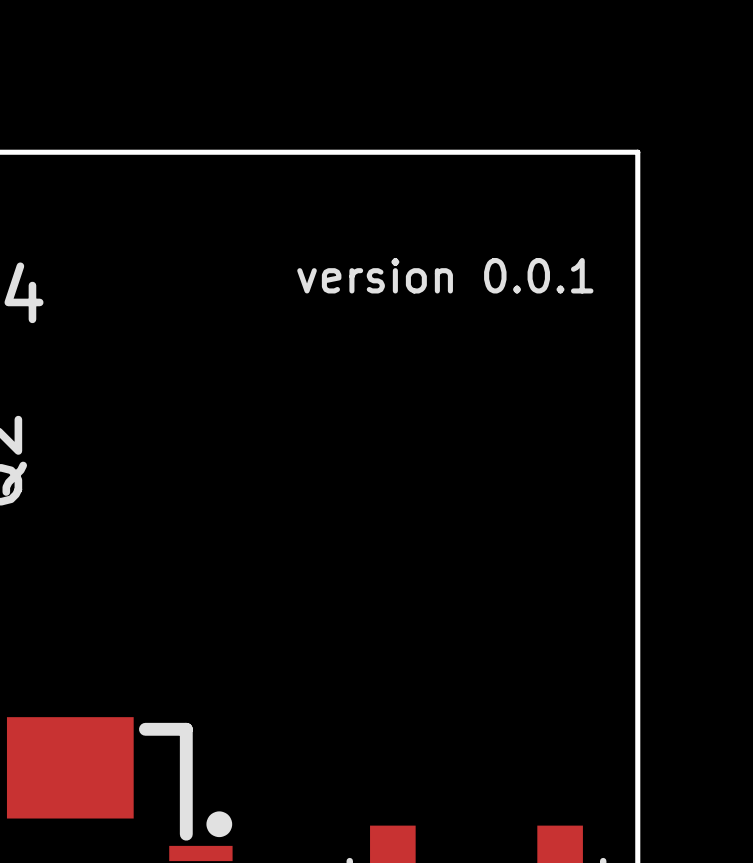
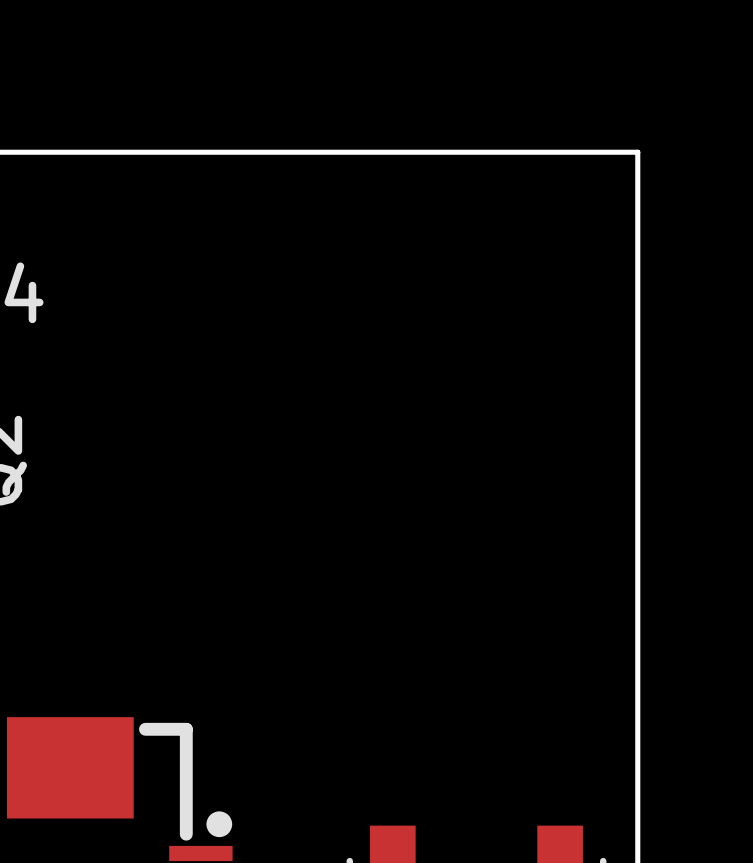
text: version 0.0.1 (445, 275) -> none

